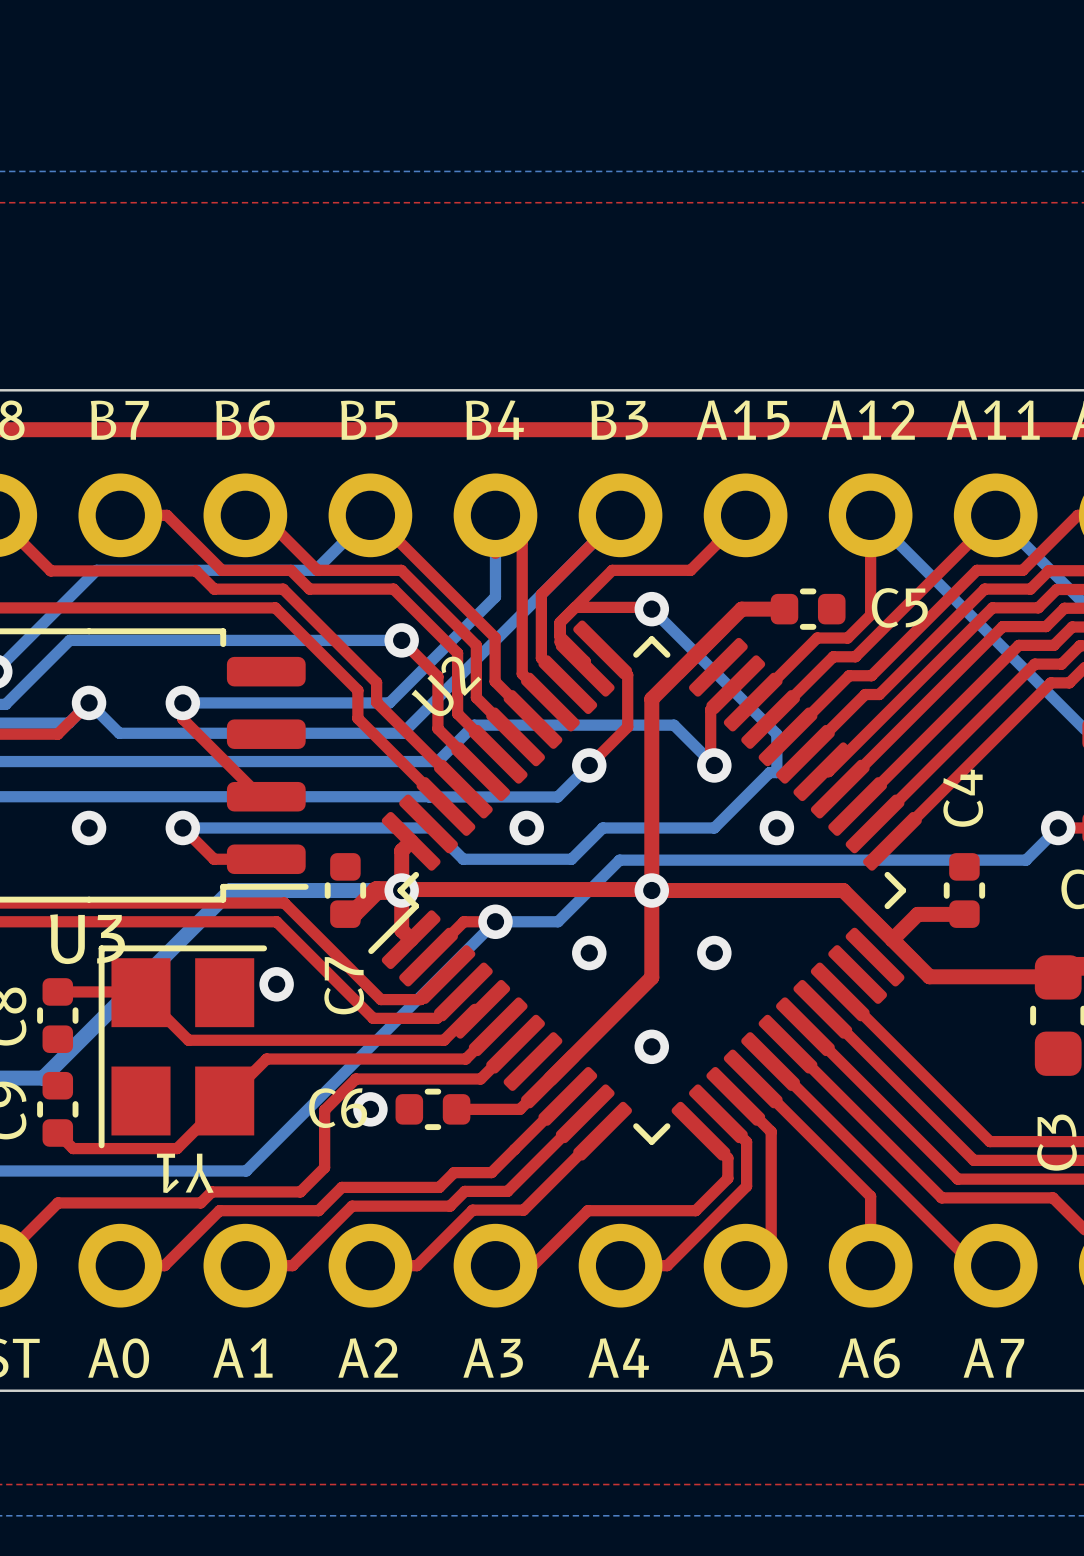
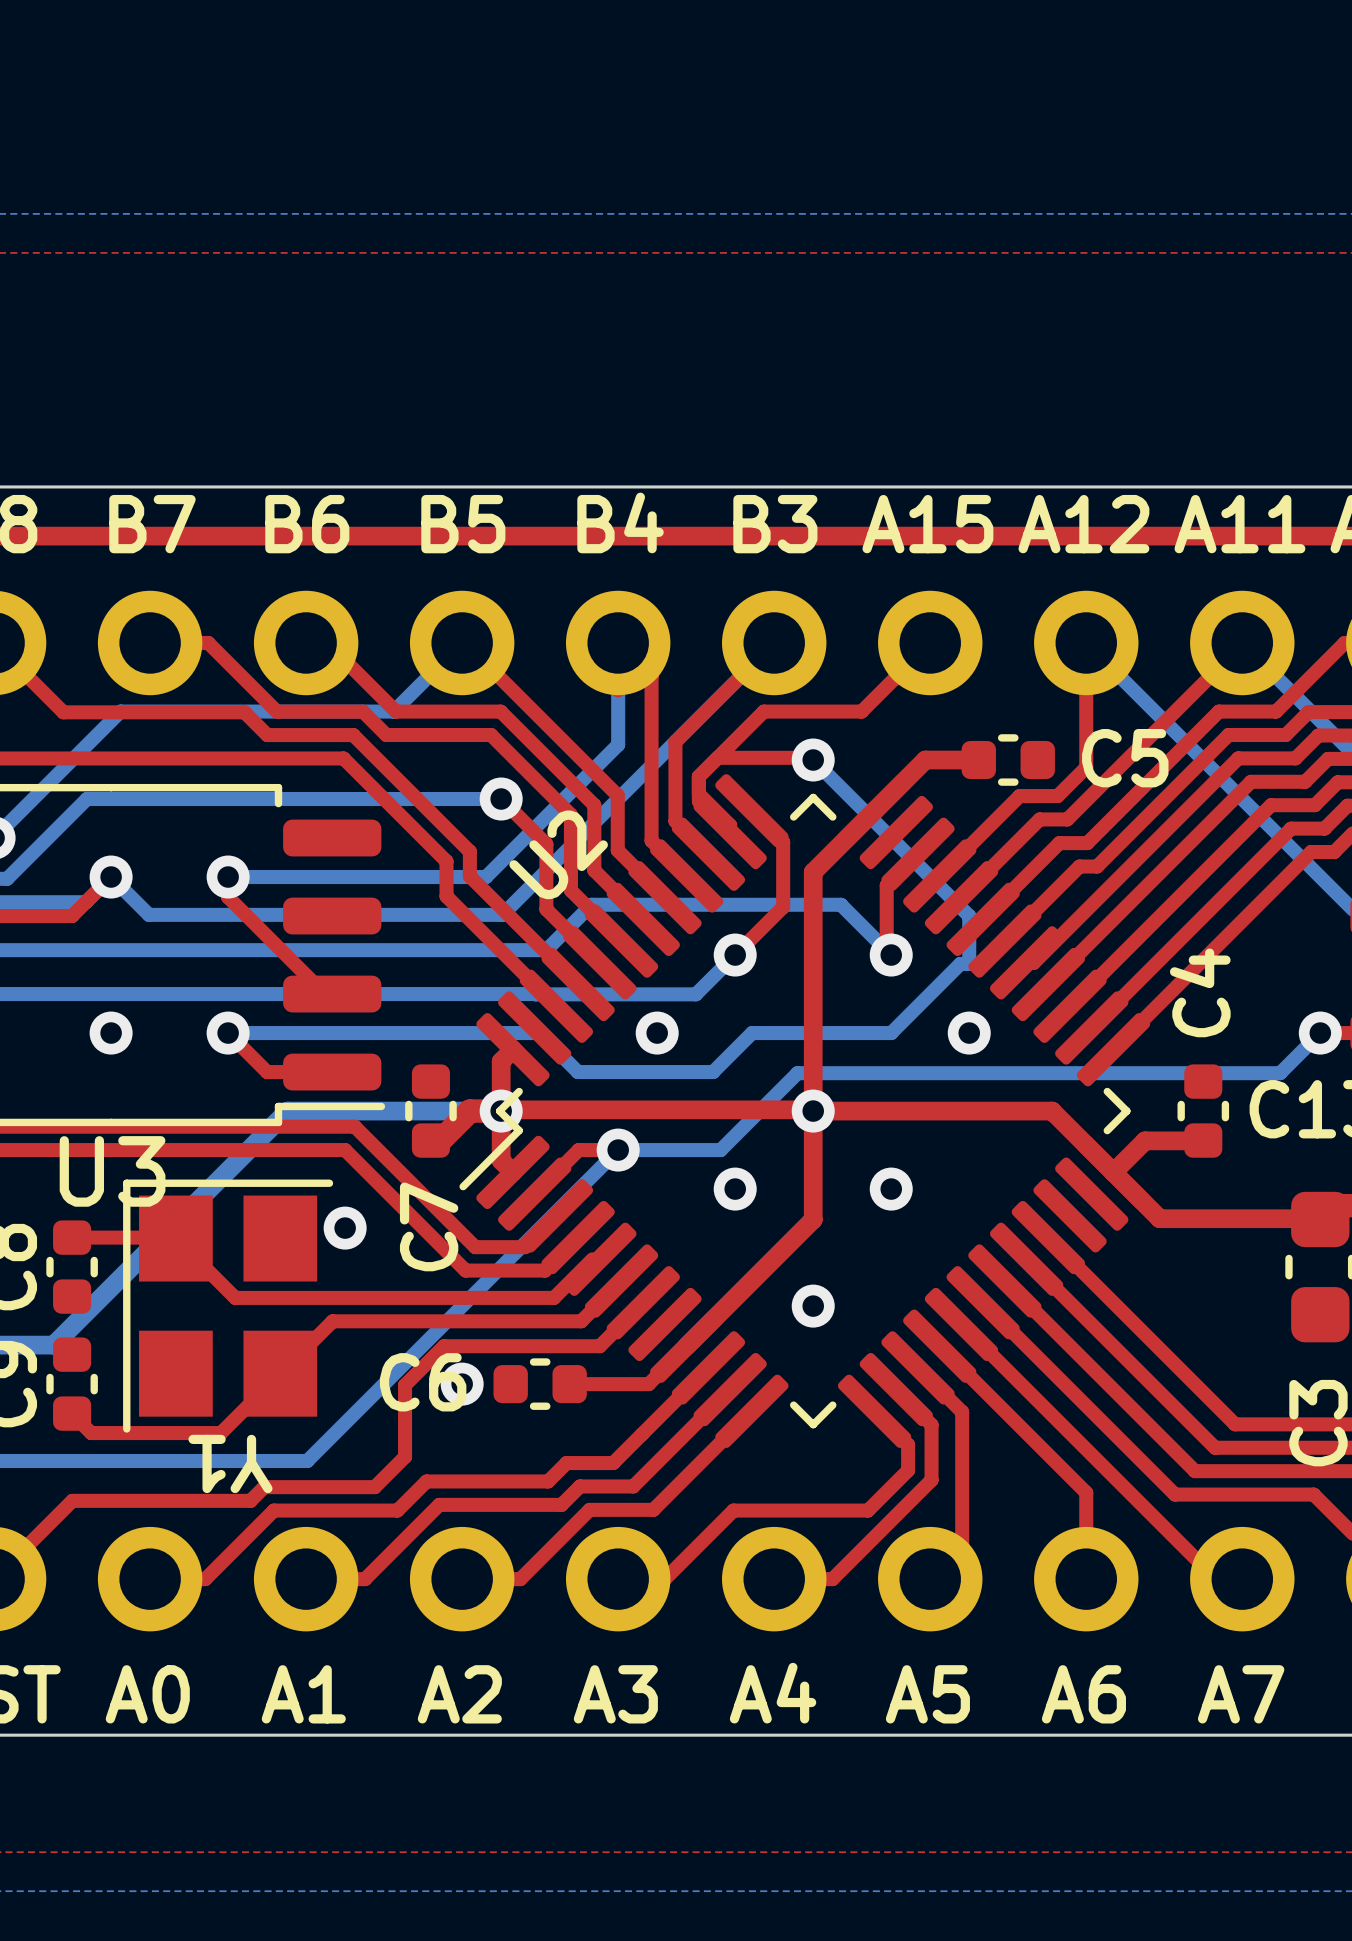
bottom track: (639, 860) (619, 860) (558, 921) -> (797, 1073) (720, 1150) (696, 1150)

